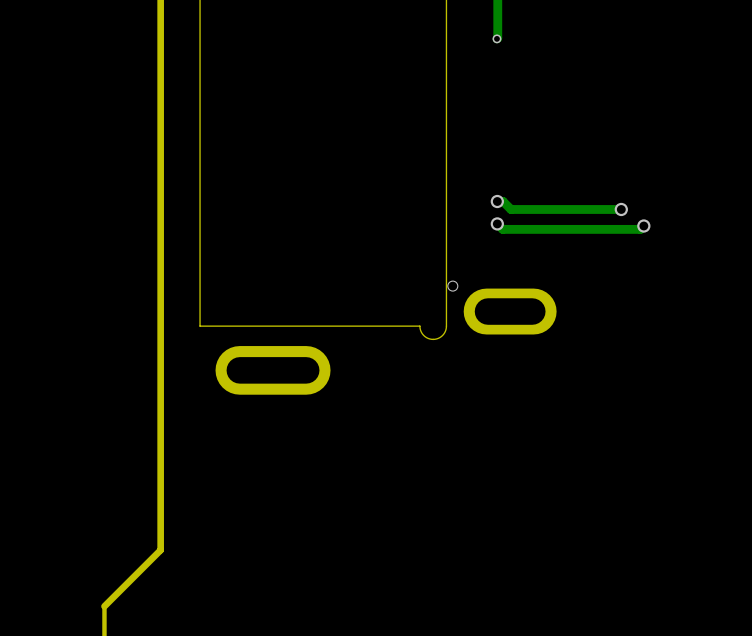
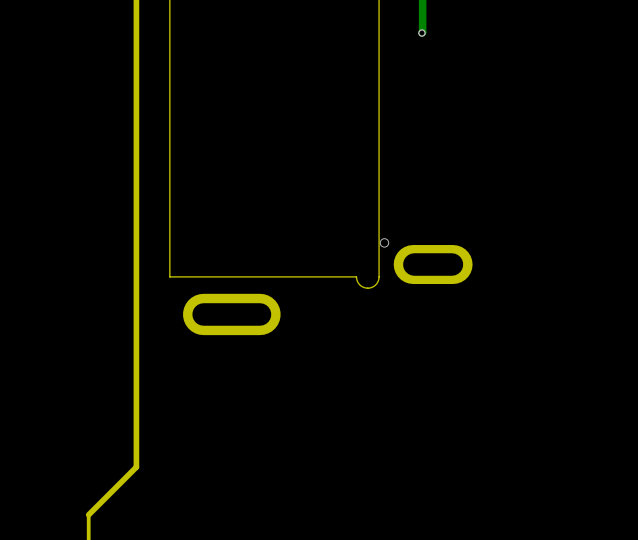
track: (497, 201) (503, 201) (511, 209) (621, 209) -> none
via: (497, 201) -> none
via: (621, 209) -> none
track: (497, 223) (502, 229) (640, 229) (643, 226) -> none
via: (497, 223) -> none
via: (643, 226) -> none

